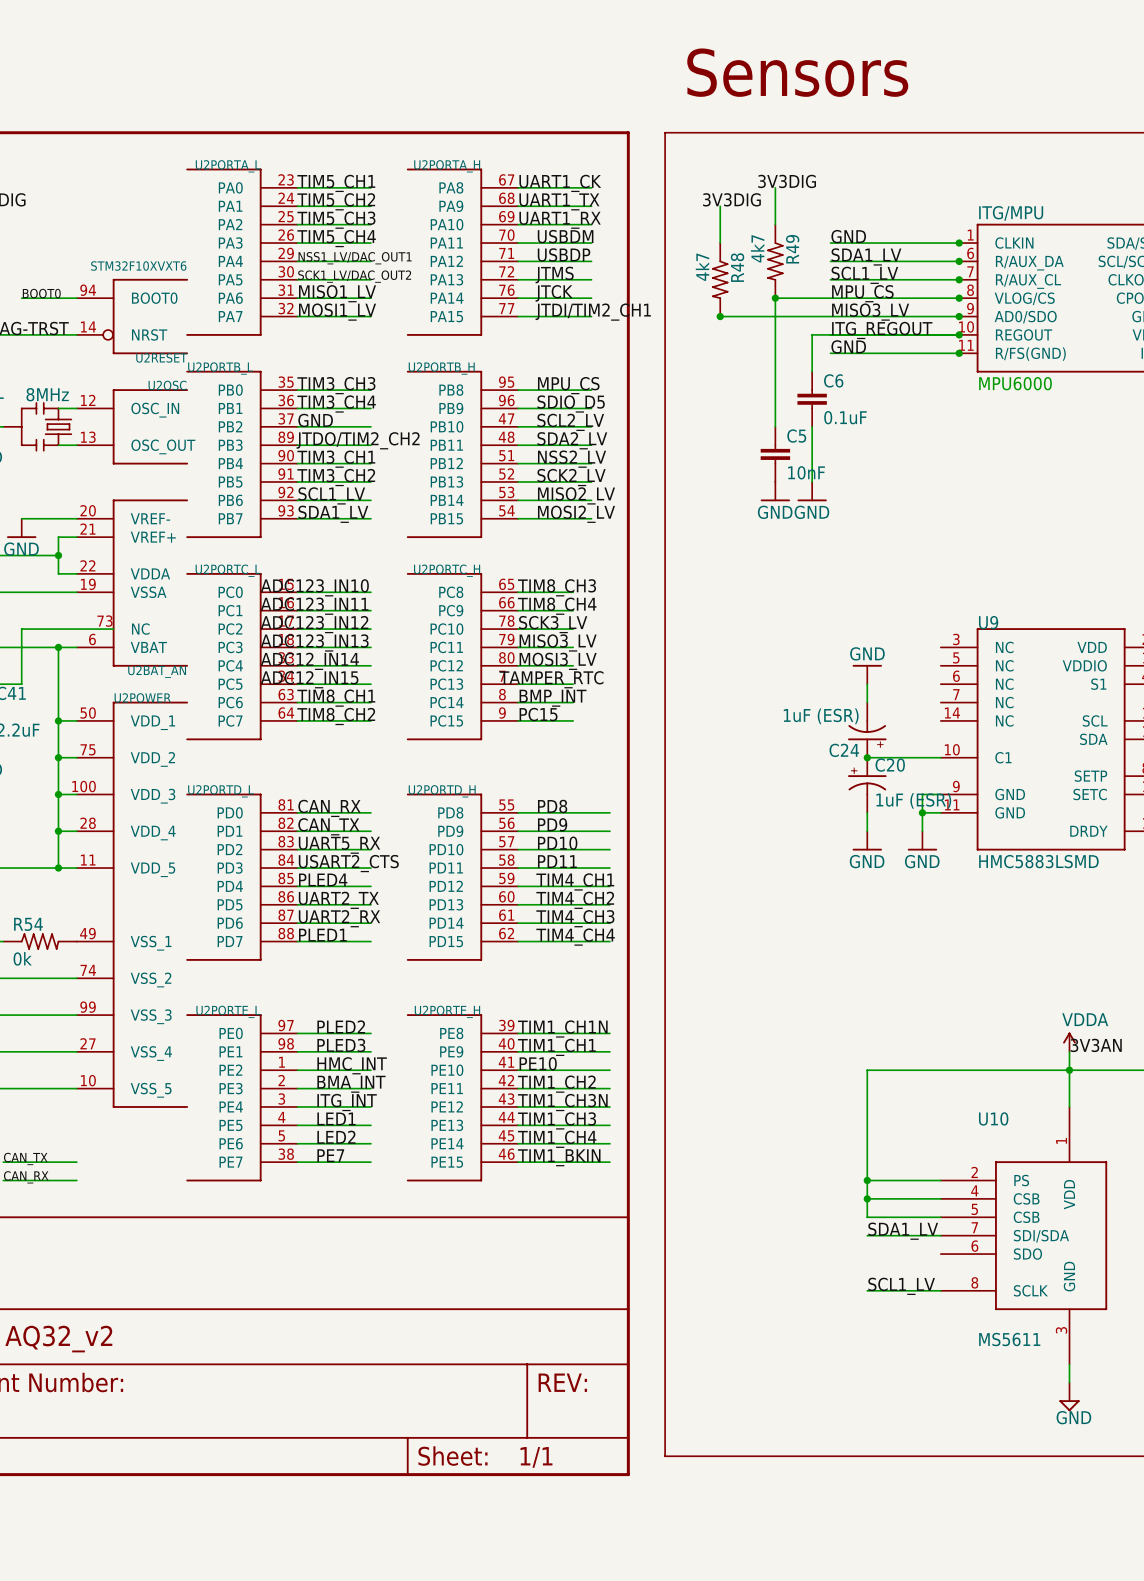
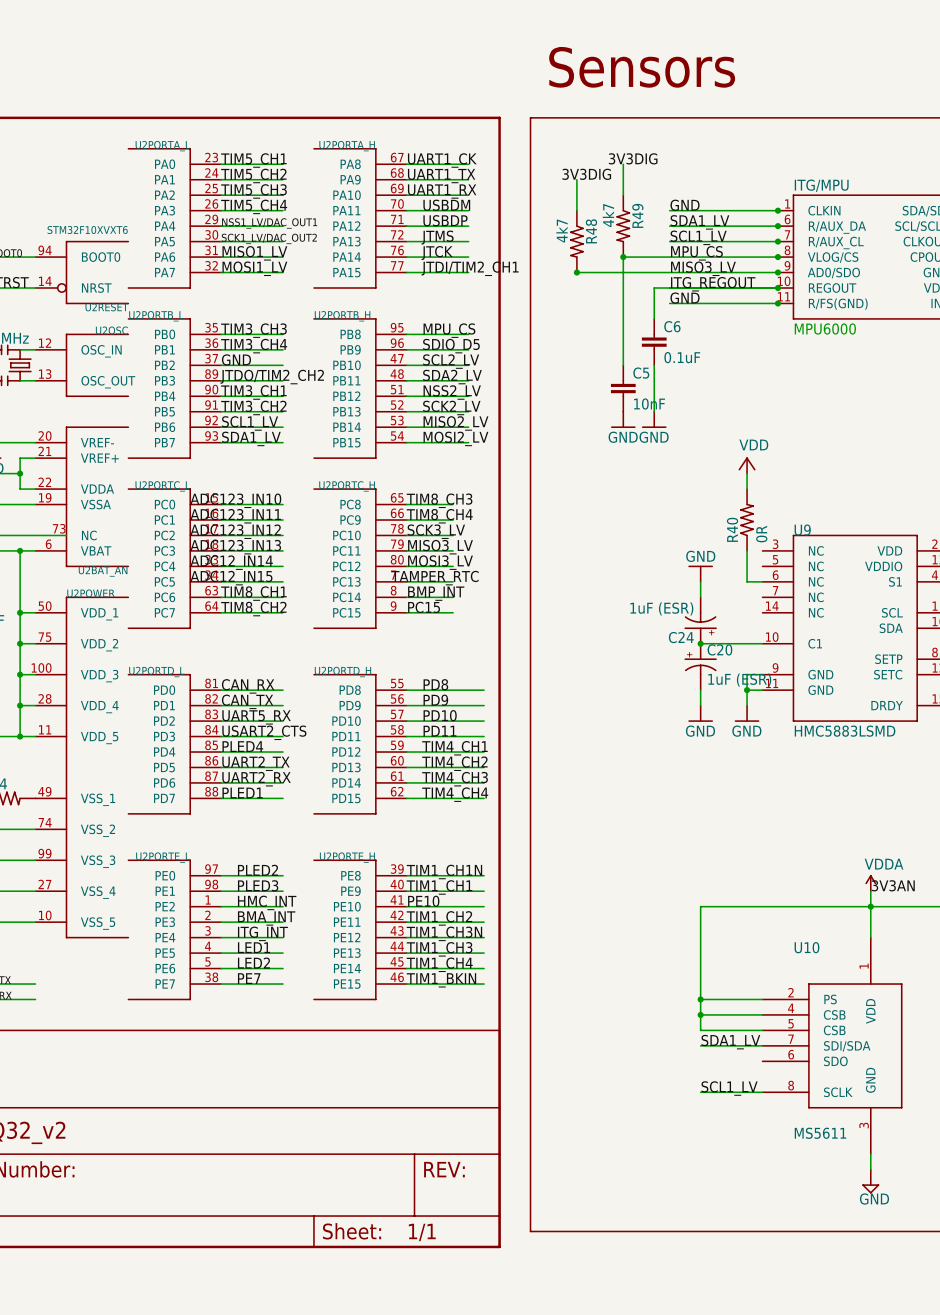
power symbol: none -> VDD (747, 465)
wire: none -> (747, 473) (747, 489)
R40: none -> 0R (747, 520)
wire: none -> (747, 550) (747, 581) (762, 581)

